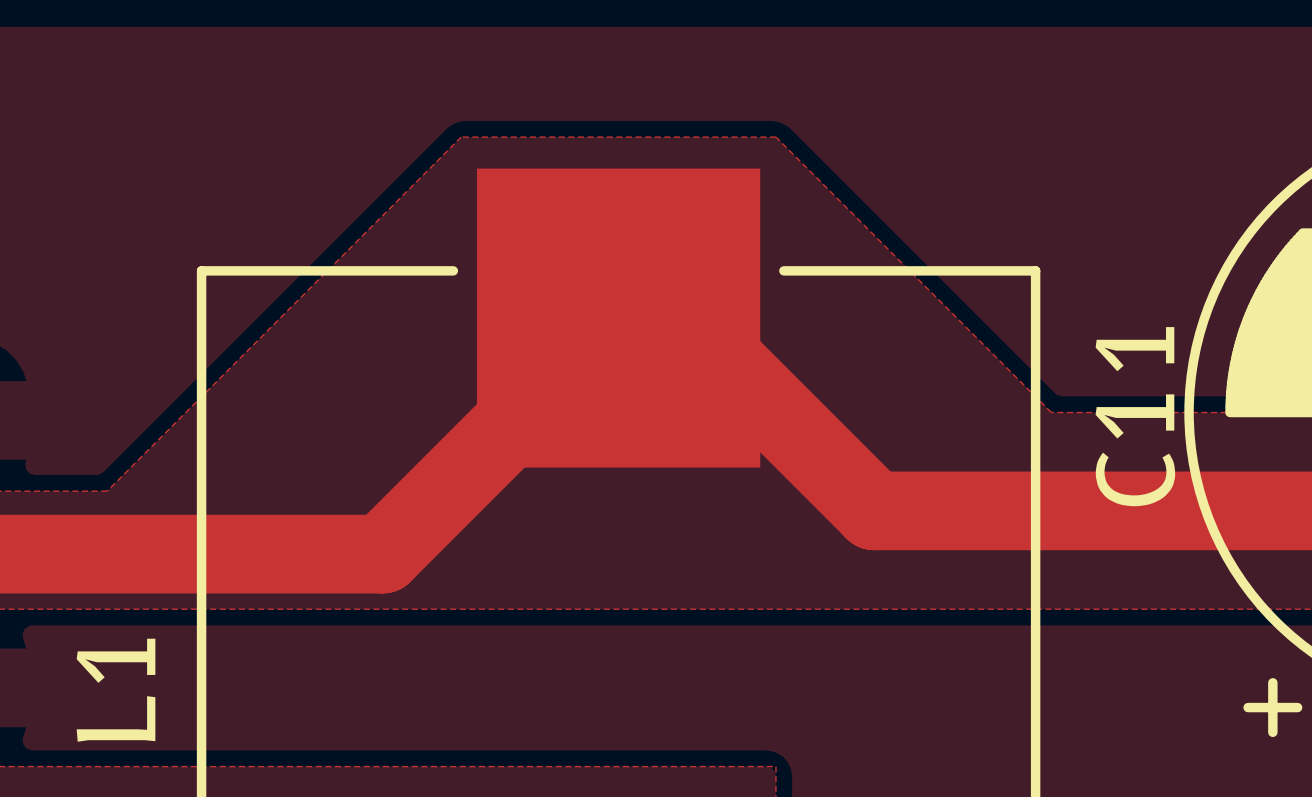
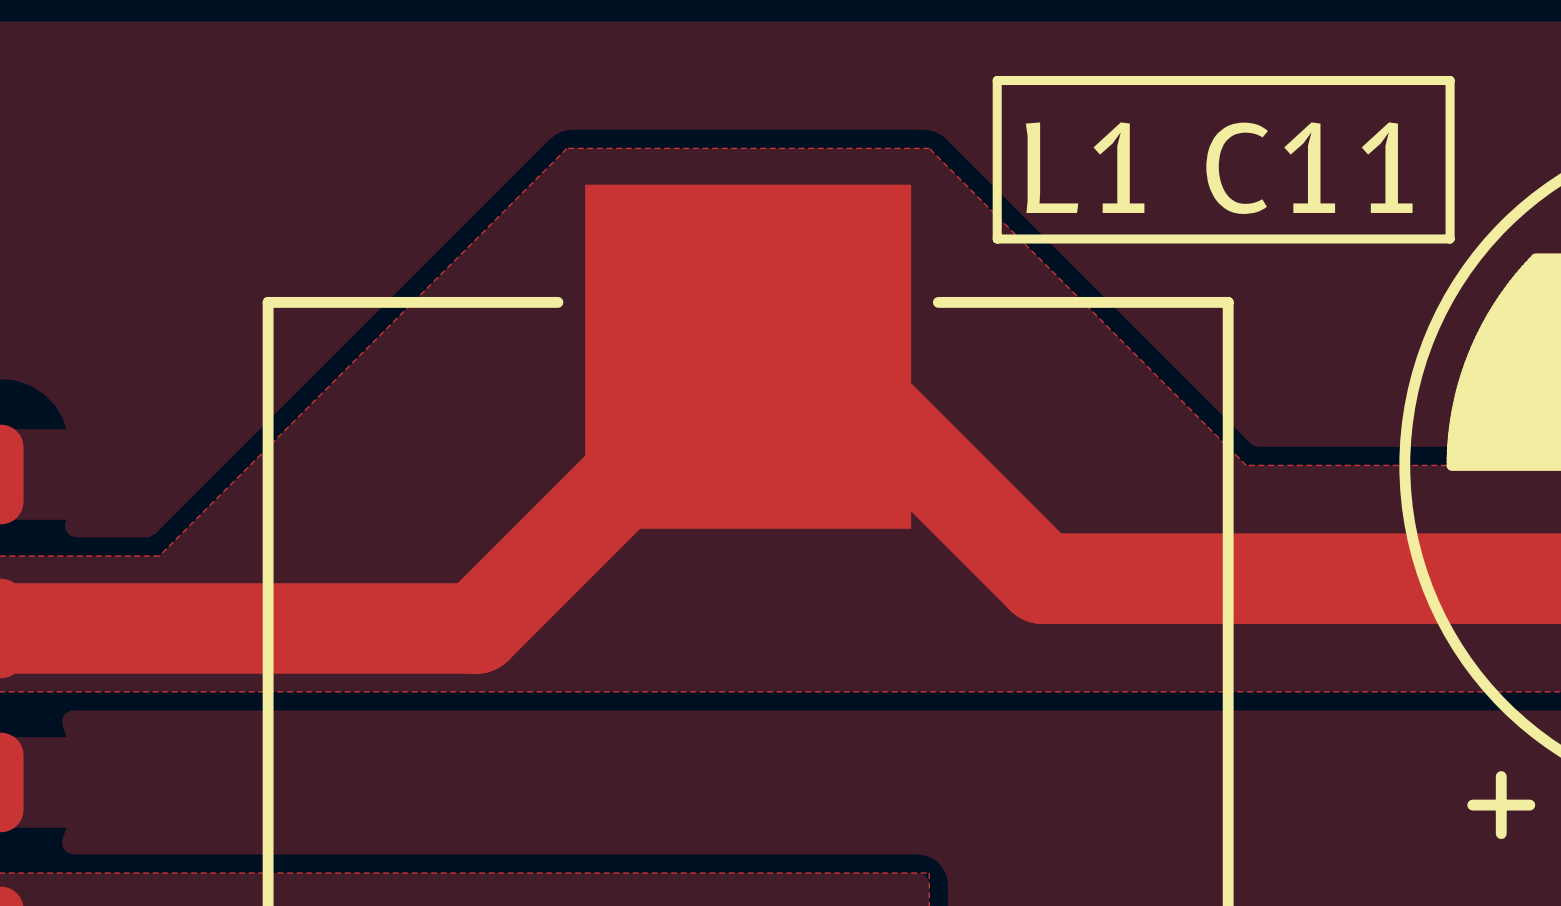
line: none -> (997, 80) (1450, 80) (1450, 239) (997, 239) (997, 80)
C11 name rotation: 0° (1135, 416) -> 90° clockwise (1309, 168)
L1 name rotation: 0° (116, 690) -> 90° clockwise (1085, 167)
L1 name position: L1 (116, 690) -> L1 (1085, 167)

